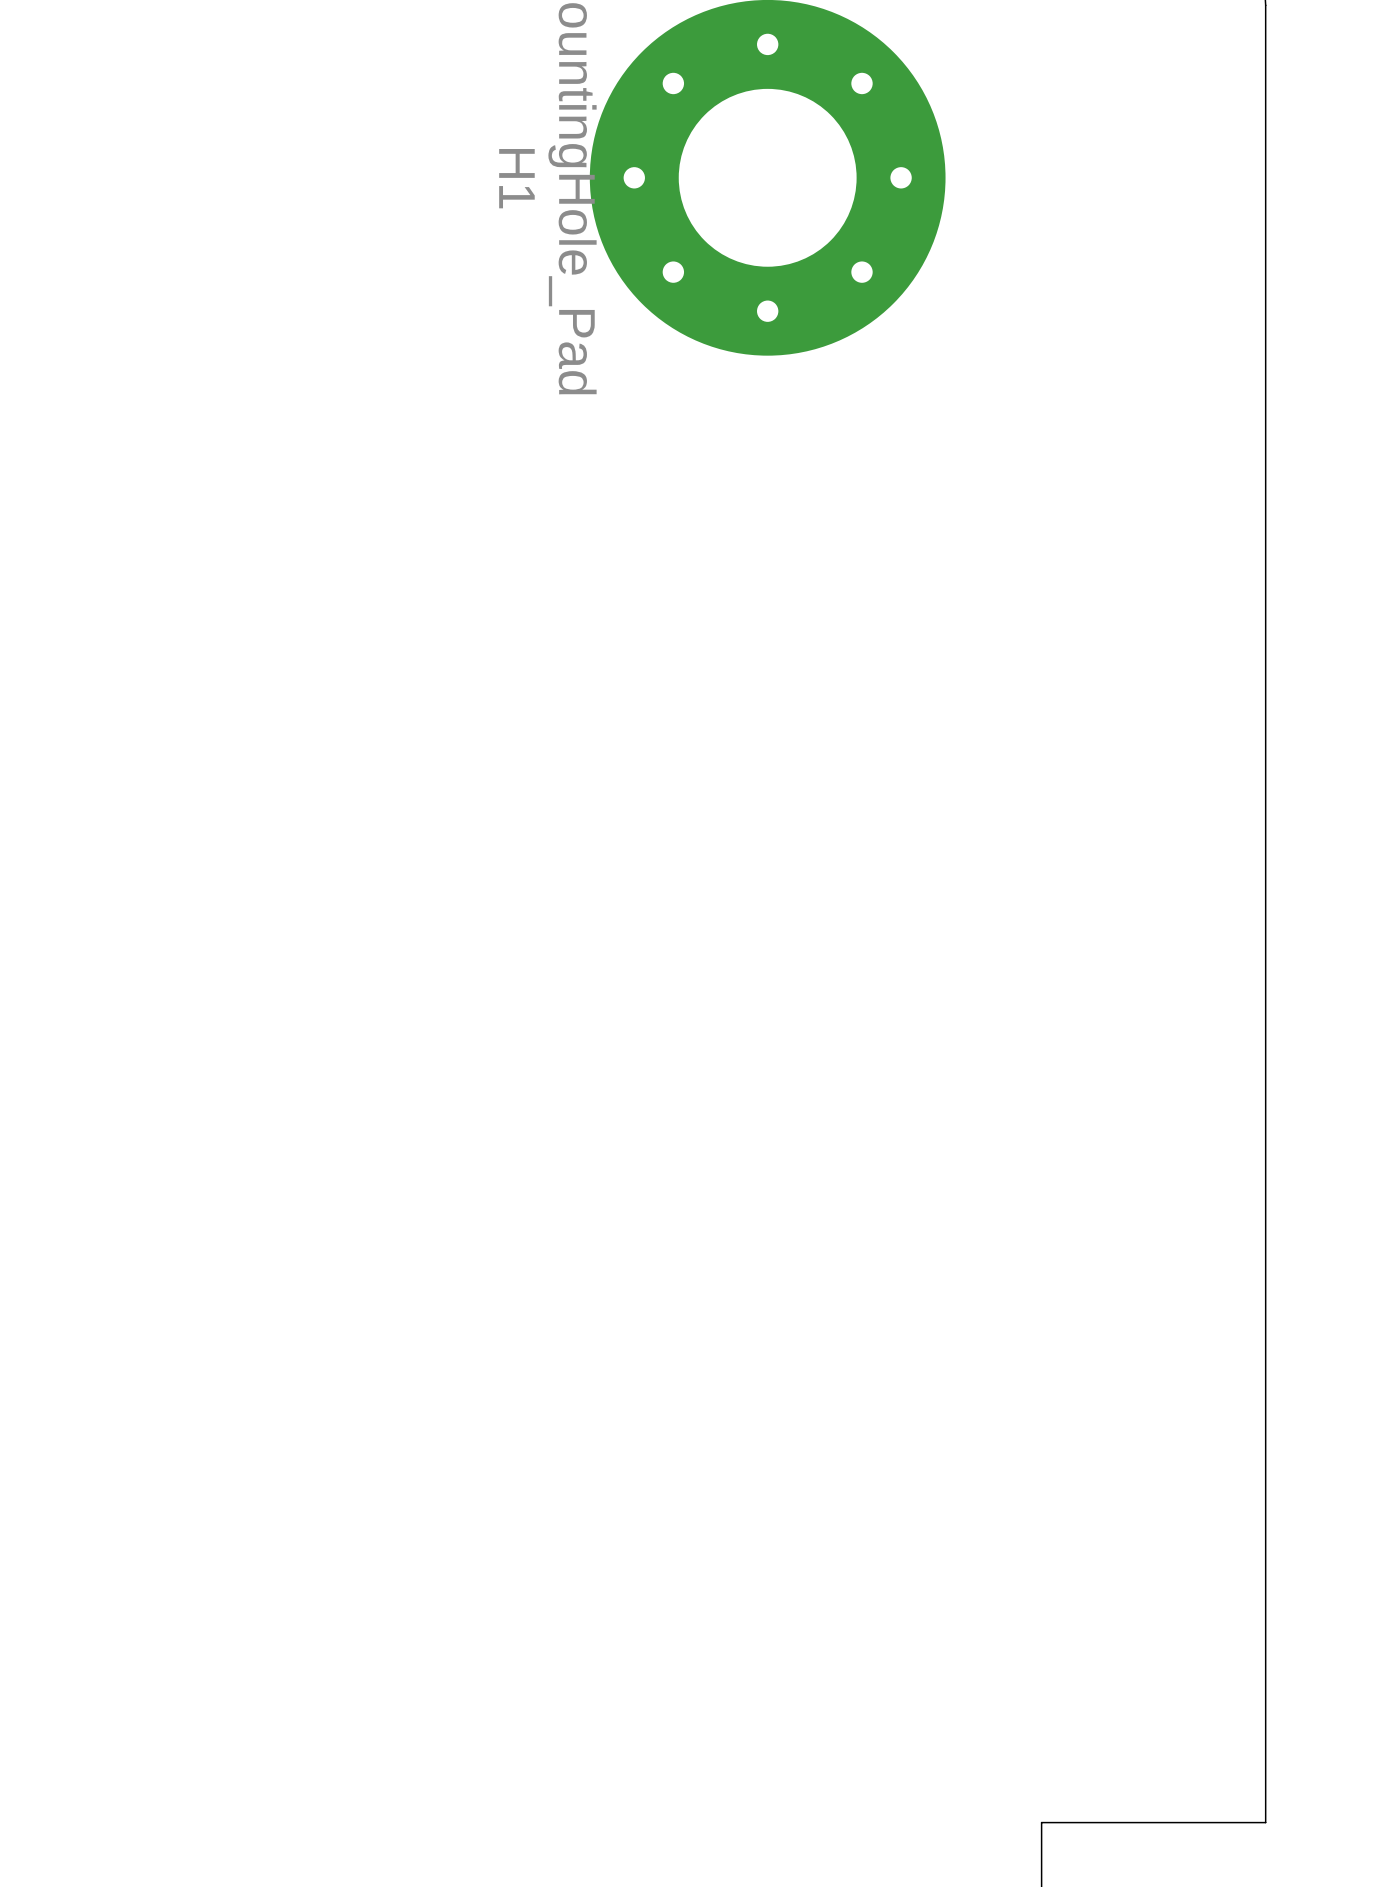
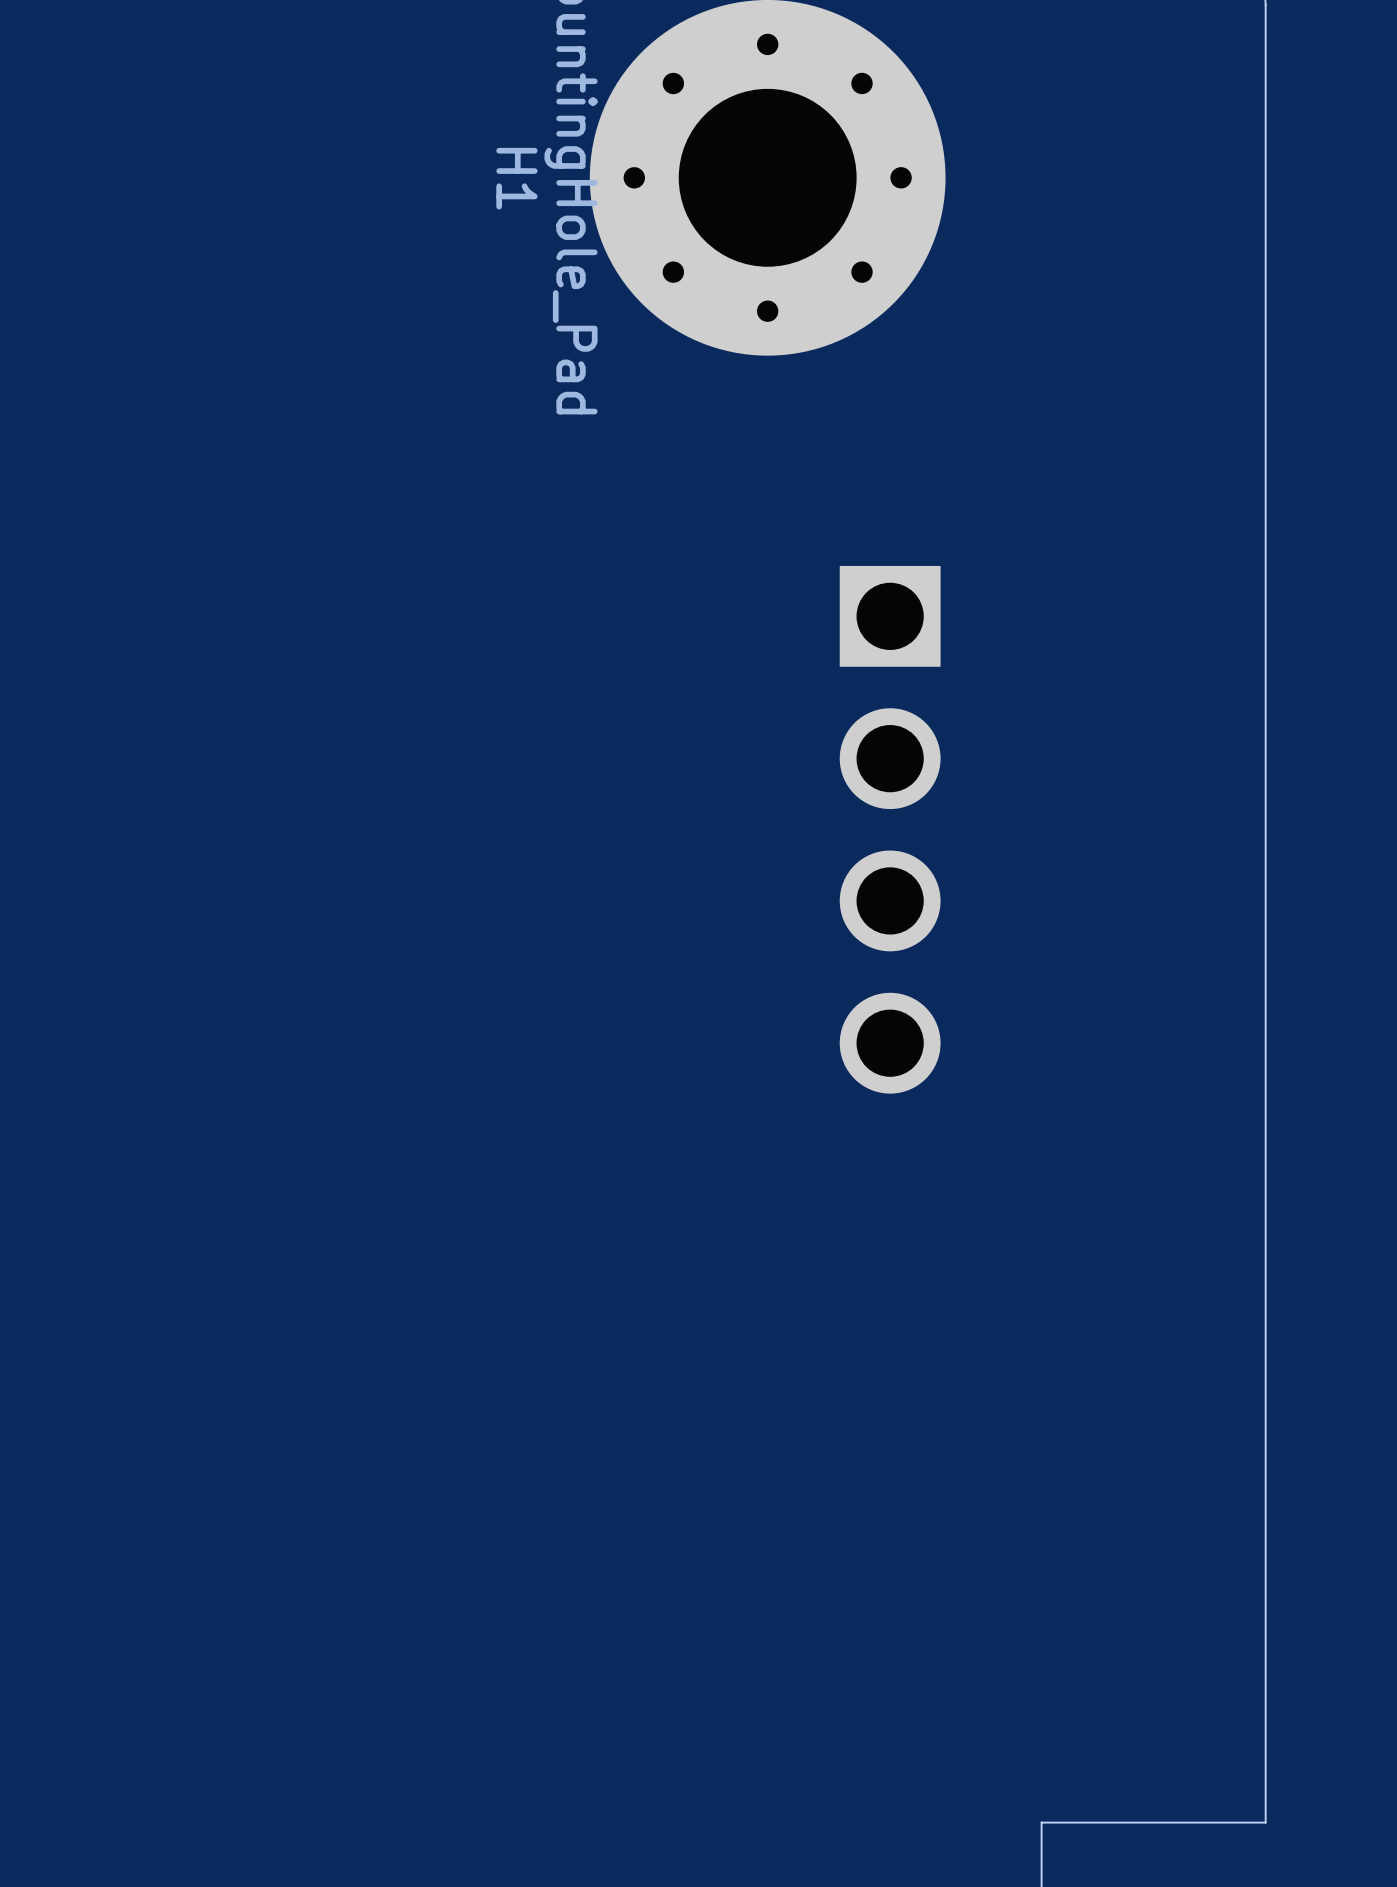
part: none -> (890, 829)

